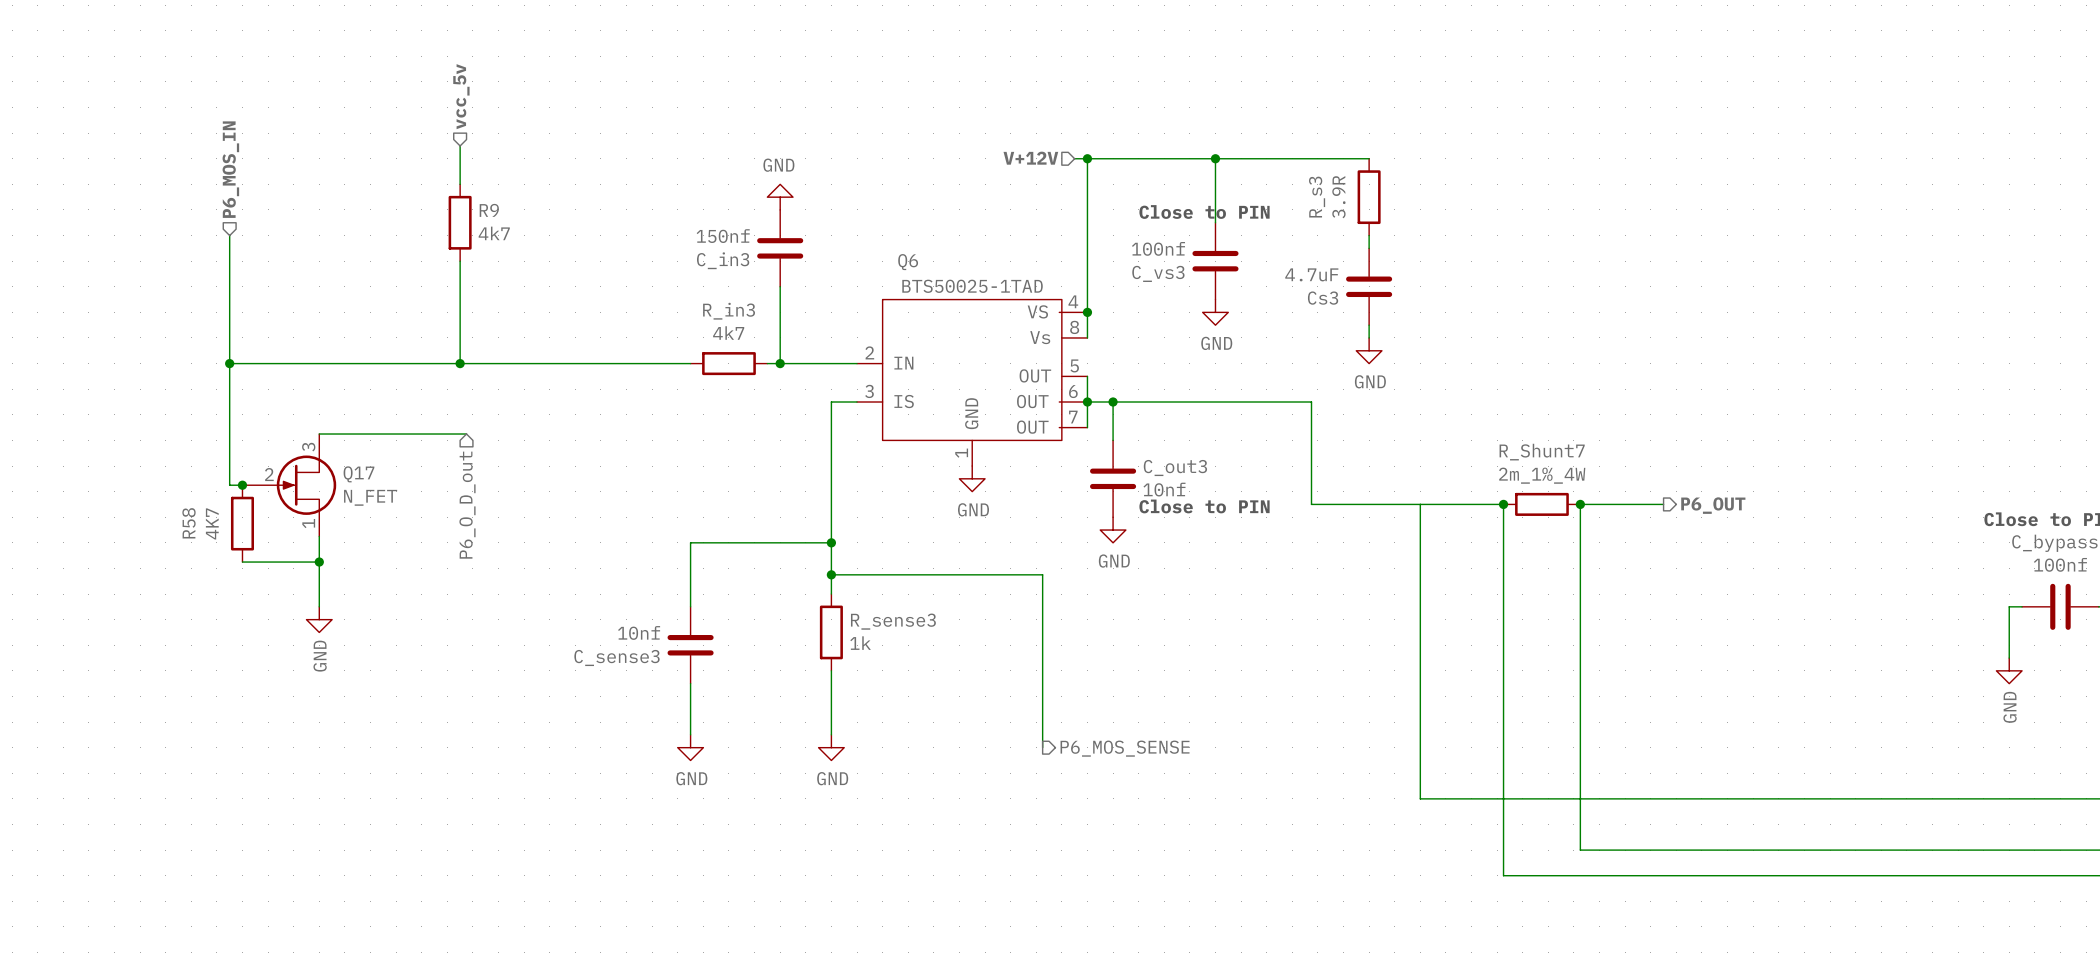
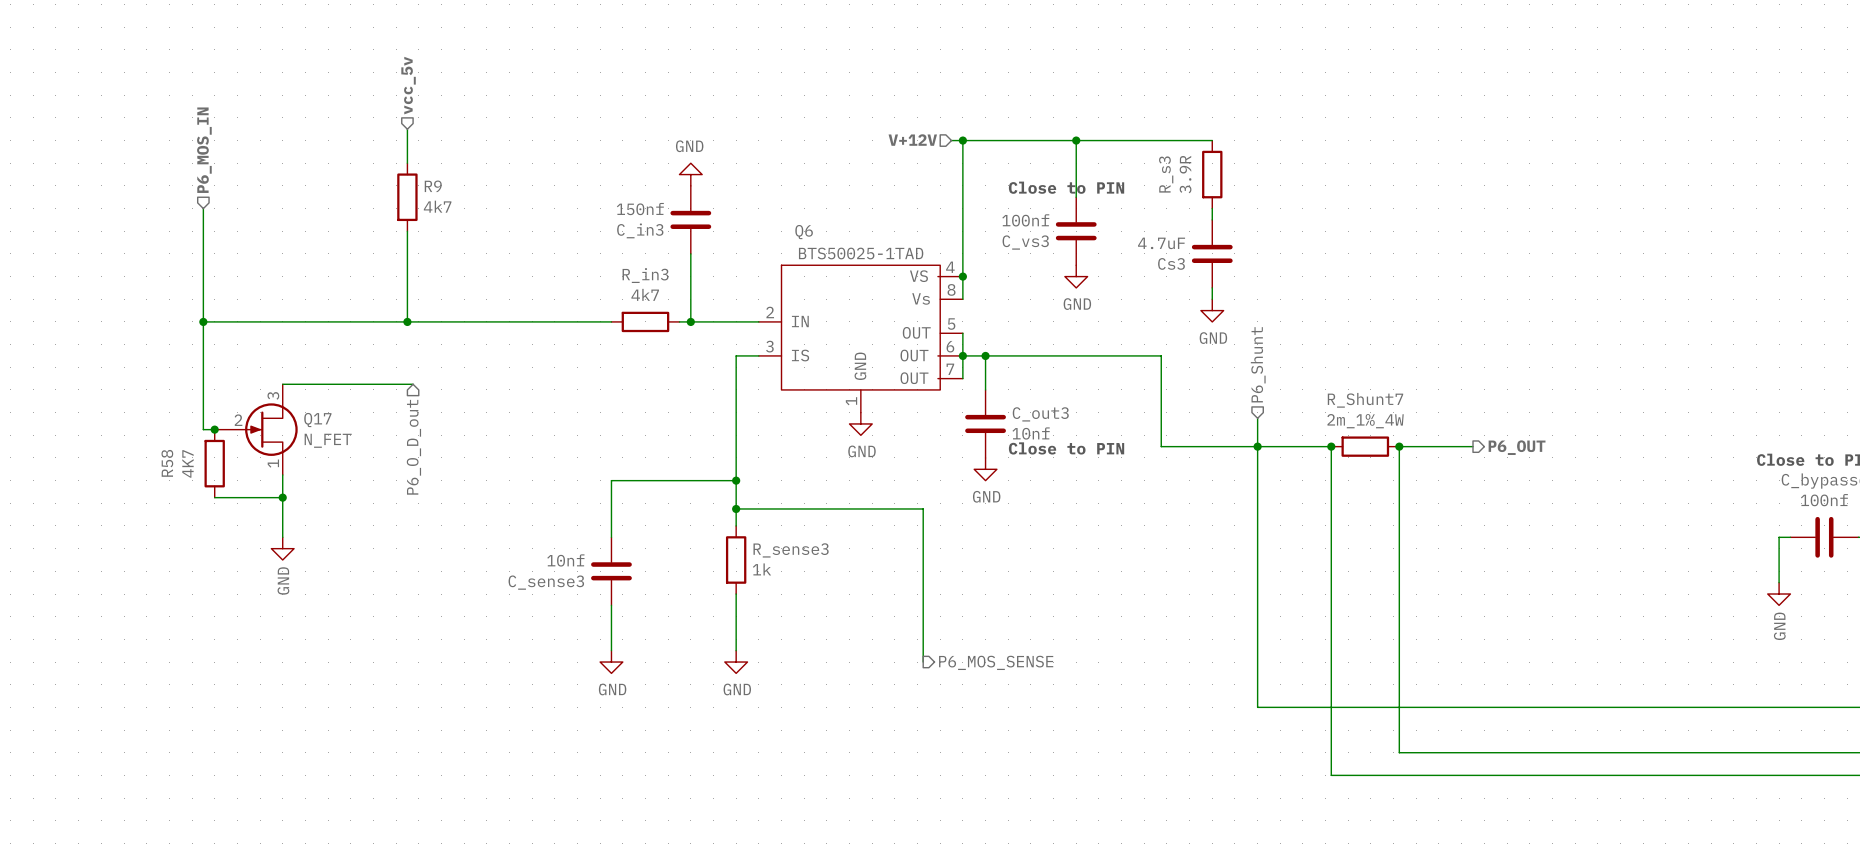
hierarchical label: none -> P6_Shunt (1258, 364)
wire: none -> (1257, 418) (1257, 446)
junction: none -> (1257, 446)

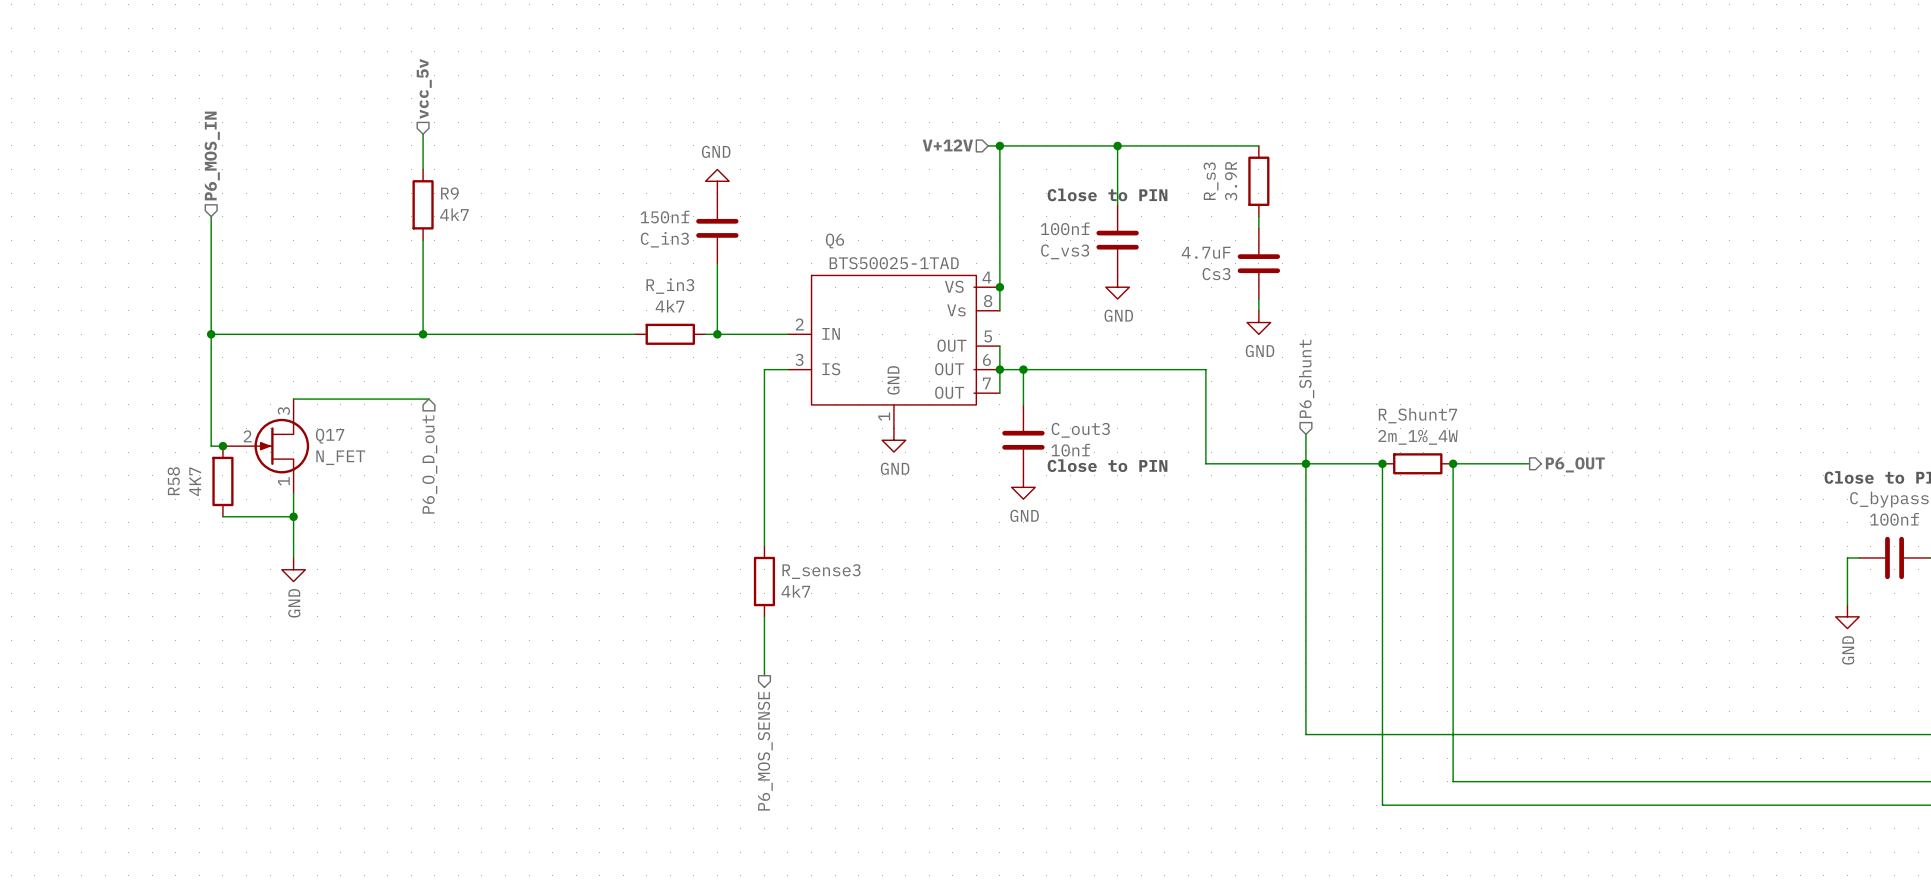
wire: (736, 480) (611, 480) (611, 537) -> none
junction: (736, 480) -> none
wire: (736, 508) (923, 508) (923, 662) -> none
junction: (736, 508) -> none
R_sense3 value: 1k (761, 569) -> 4k7 (795, 591)
C_sense3: 10nf (611, 571) -> none
wire: (611, 605) (611, 650) -> none
power symbol: GND (611, 662) -> none
power symbol: GND (736, 662) -> none
hierarchical label rotation: 0° (996, 662) -> 90° clockwise (765, 751)
hierarchical label position: P6_MOS_SENSE (996, 662) -> P6_MOS_SENSE (765, 751)

